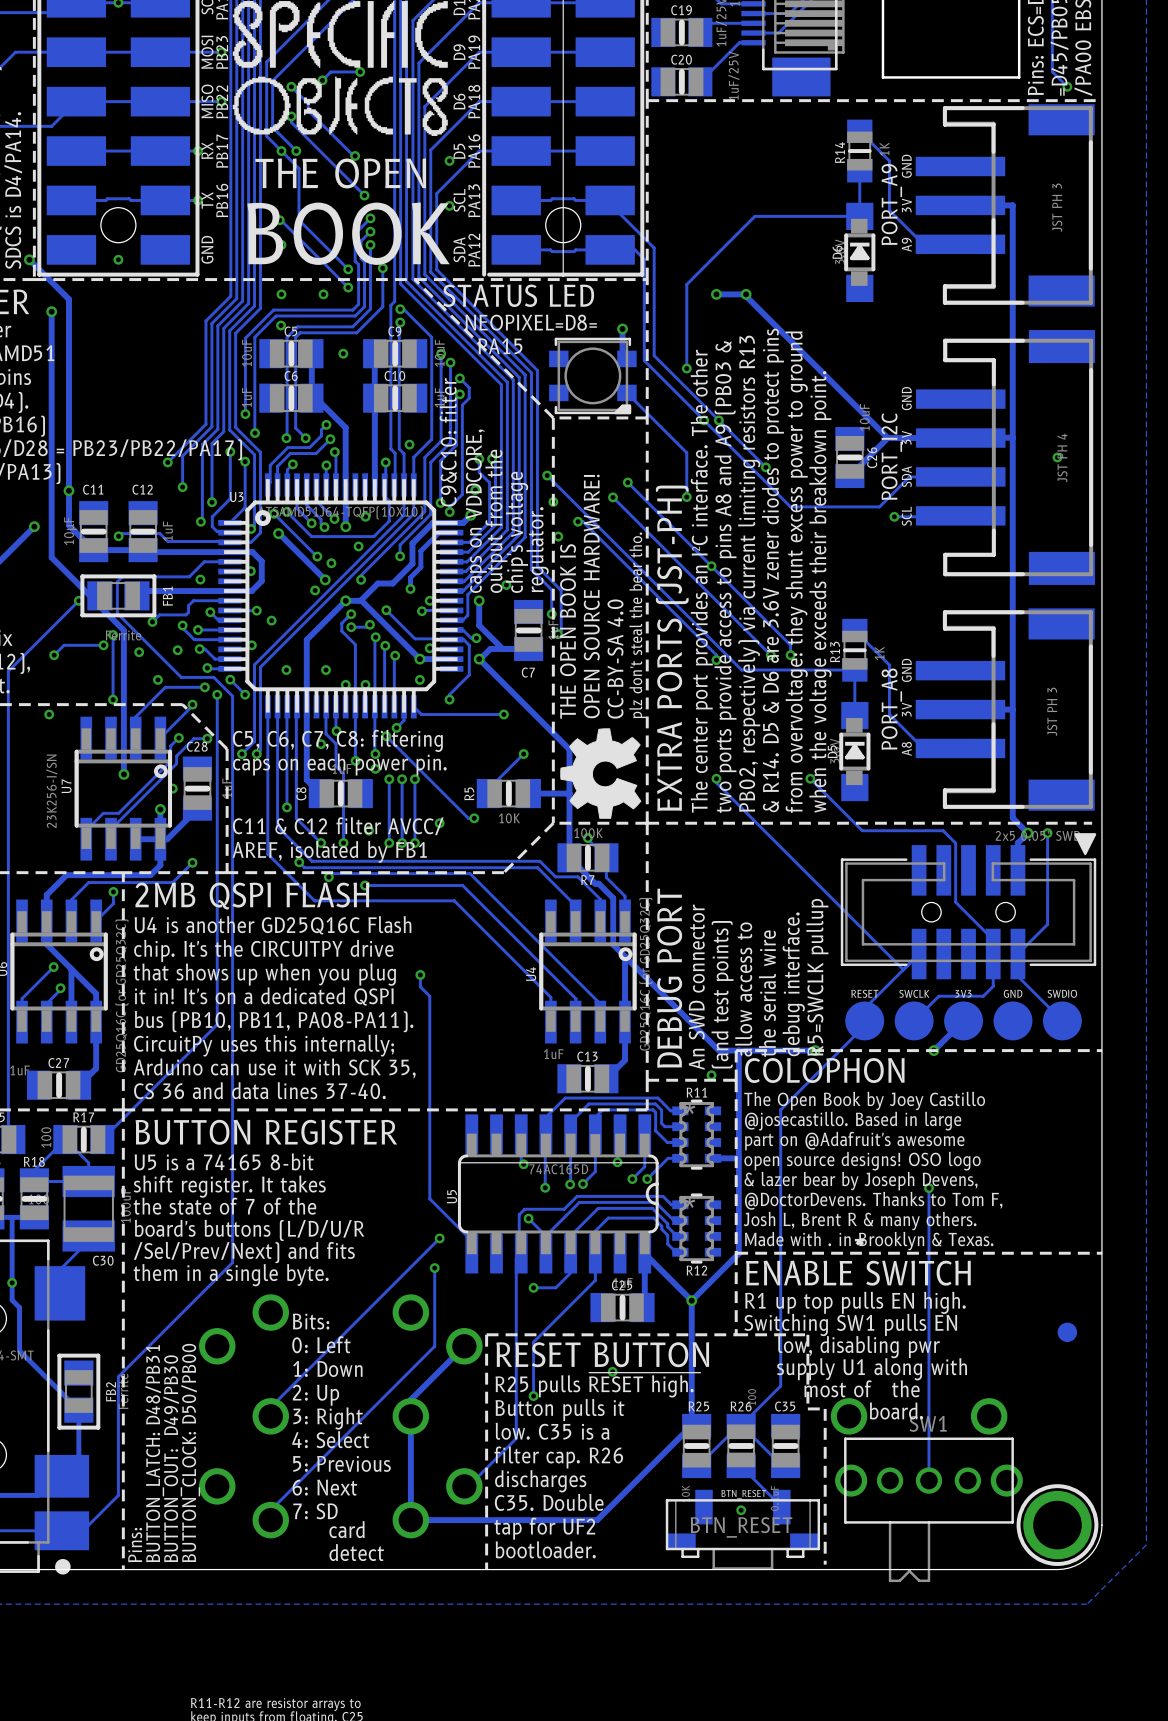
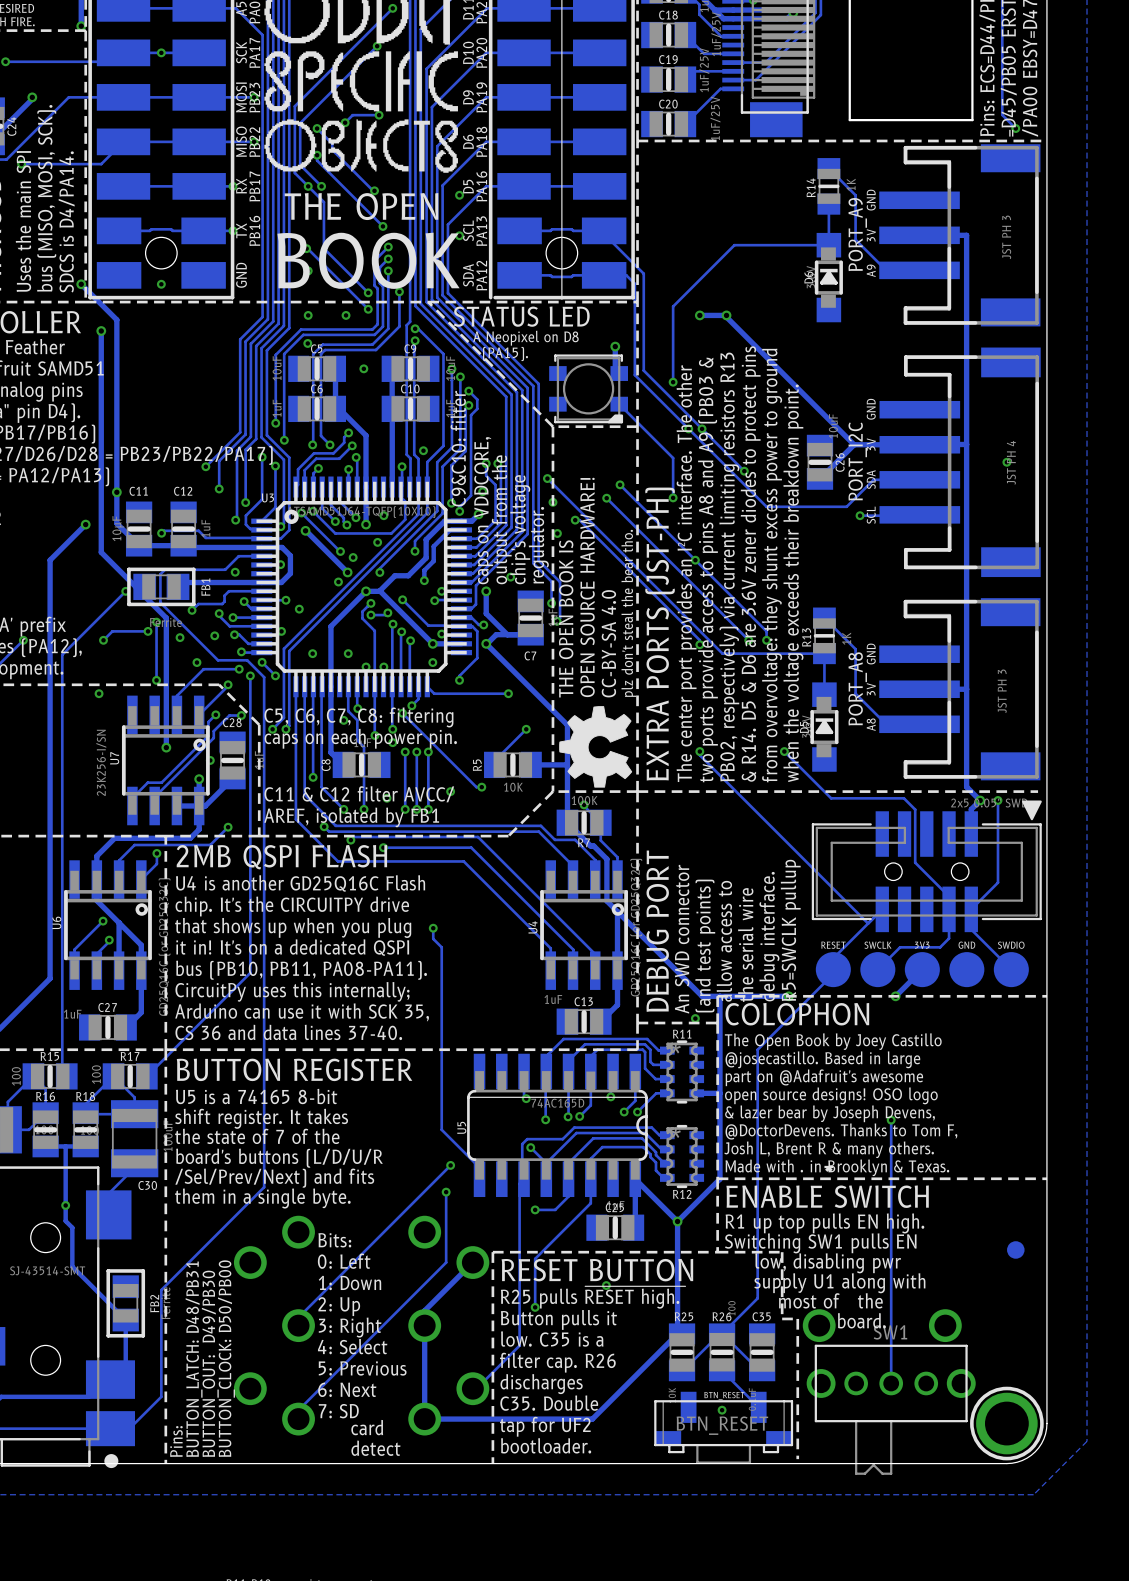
text: NEOPIXEL=D8= (531, 322) -> A Neopixel on D8 (525, 338)
text: PA15 (500, 346) -> (PA15). (505, 354)

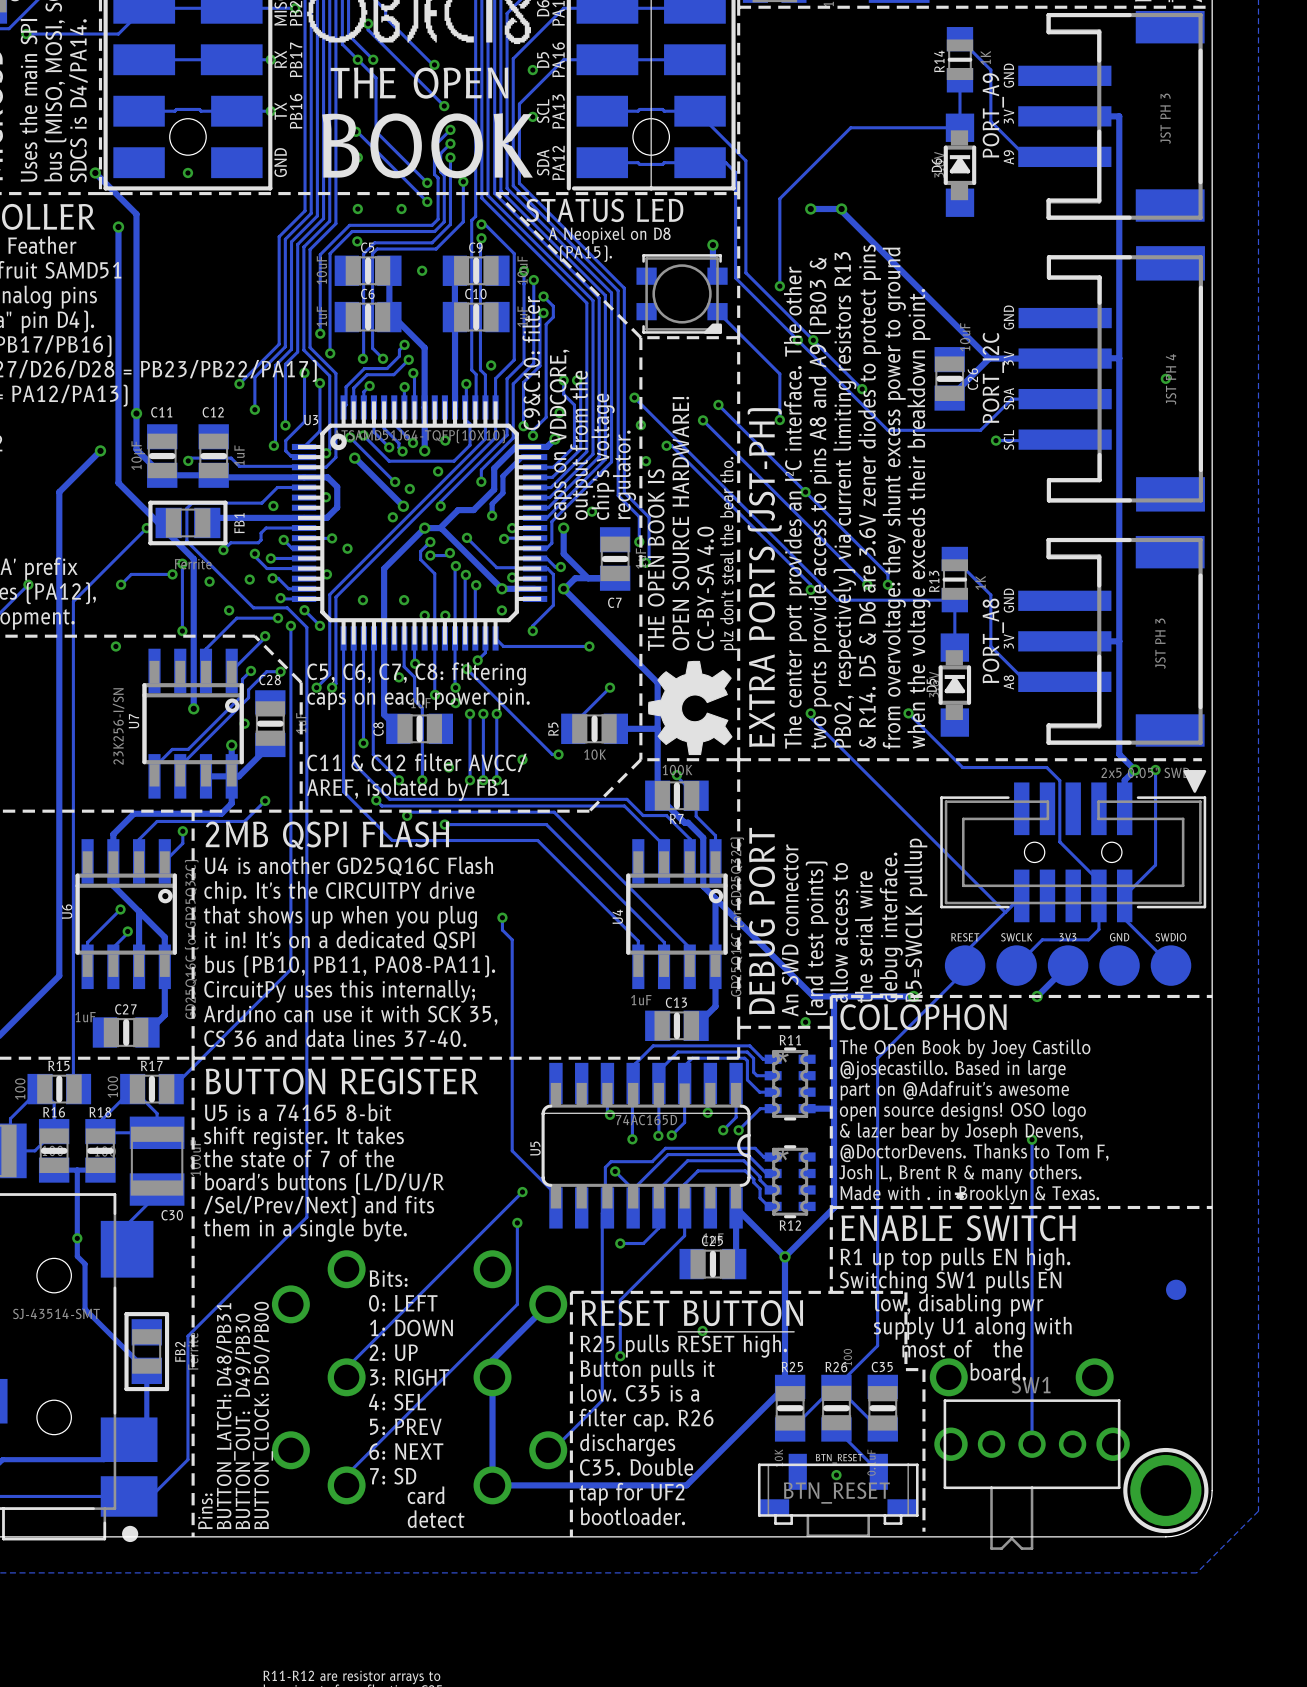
text: 0: Left (344, 1261) -> 0: LEFT (403, 1303)
text: 1: Down (349, 1282) -> 1: DOWN (411, 1328)
text: 2: Up (339, 1306) -> 2: UP (393, 1352)
text: 3: Right (350, 1327) -> 3: RIGHT (409, 1377)
text: 4: Select (352, 1346) -> 4: SEL (397, 1402)
text: 5: Previous (362, 1368) -> 5: PREV (405, 1426)
text: 6: Next (347, 1389) -> 6: NEXT (406, 1451)

